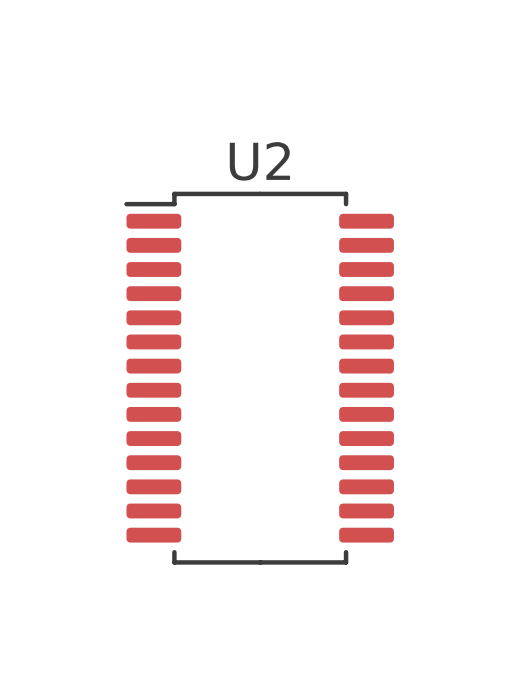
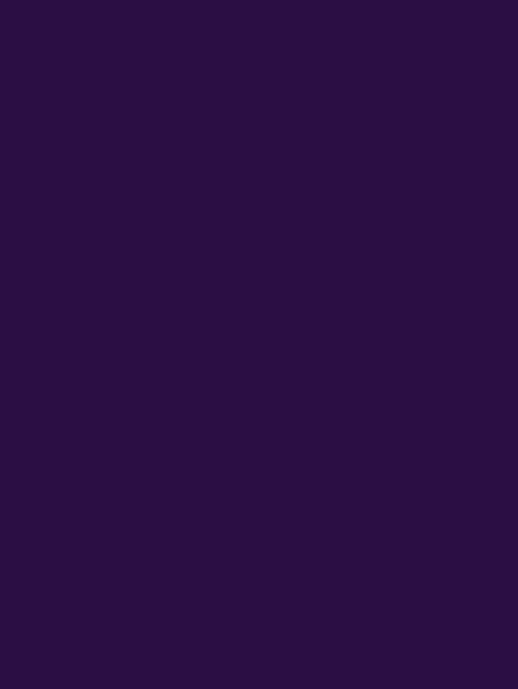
U2: (259, 378) -> none

